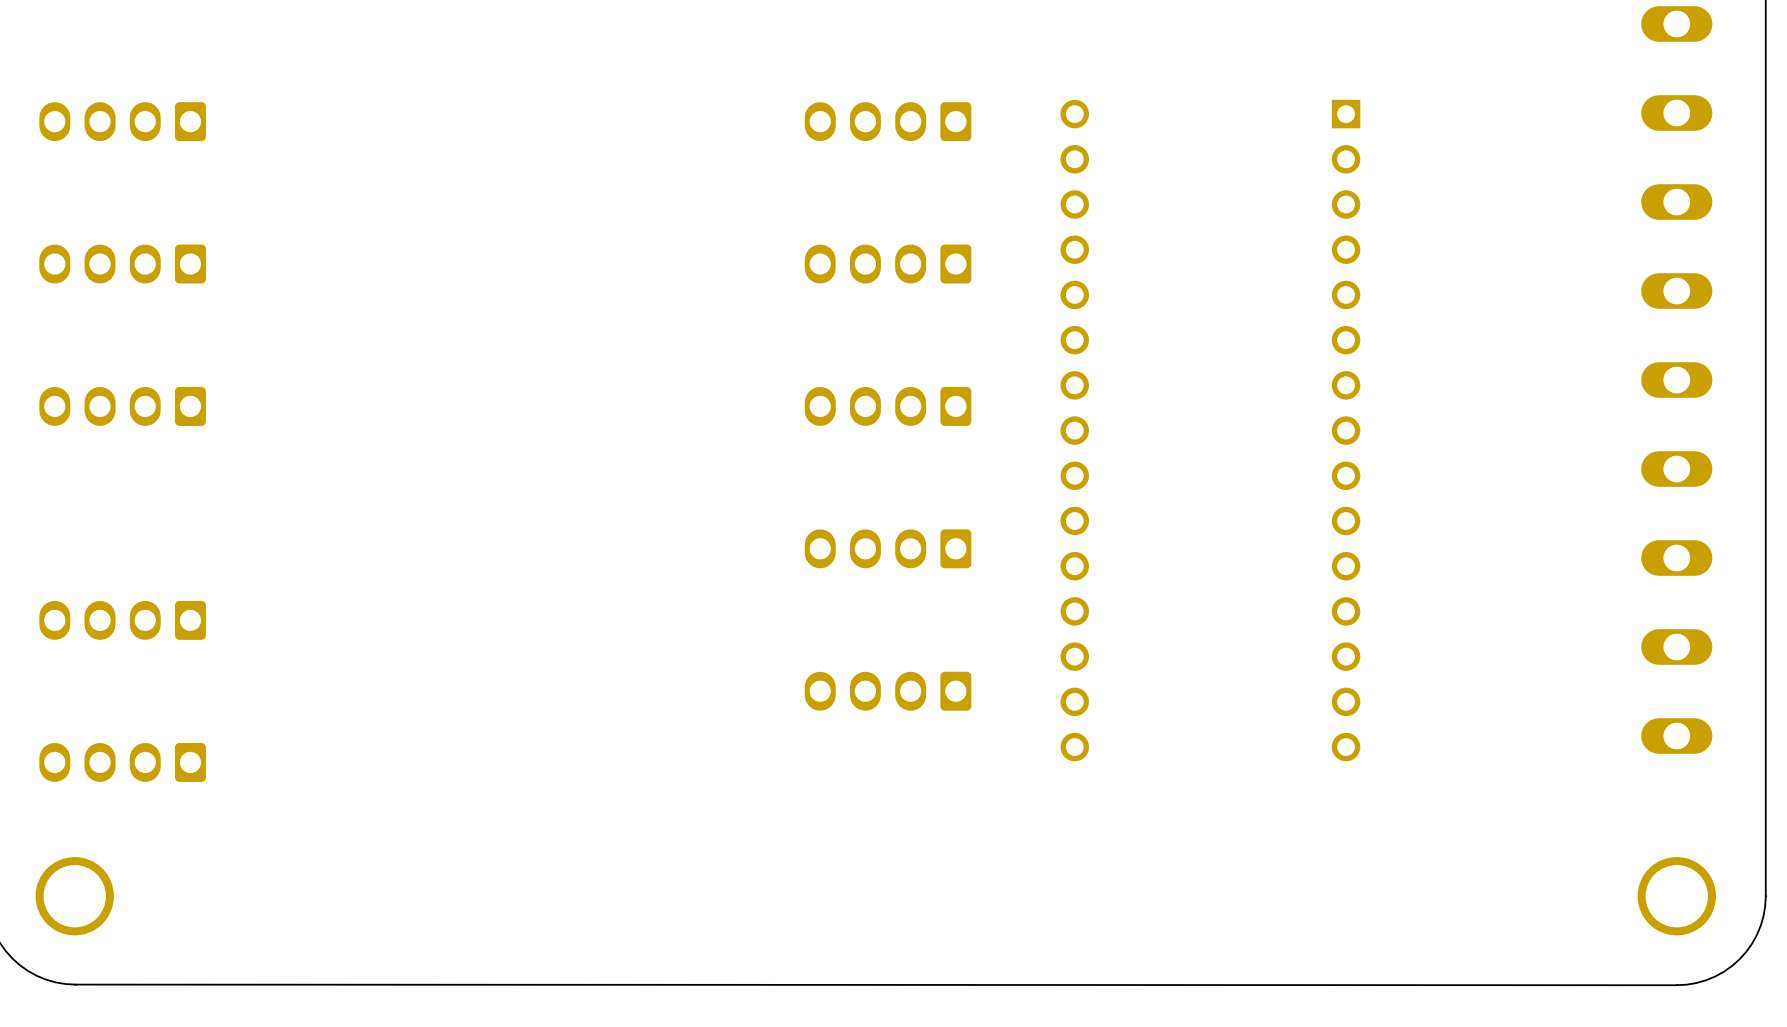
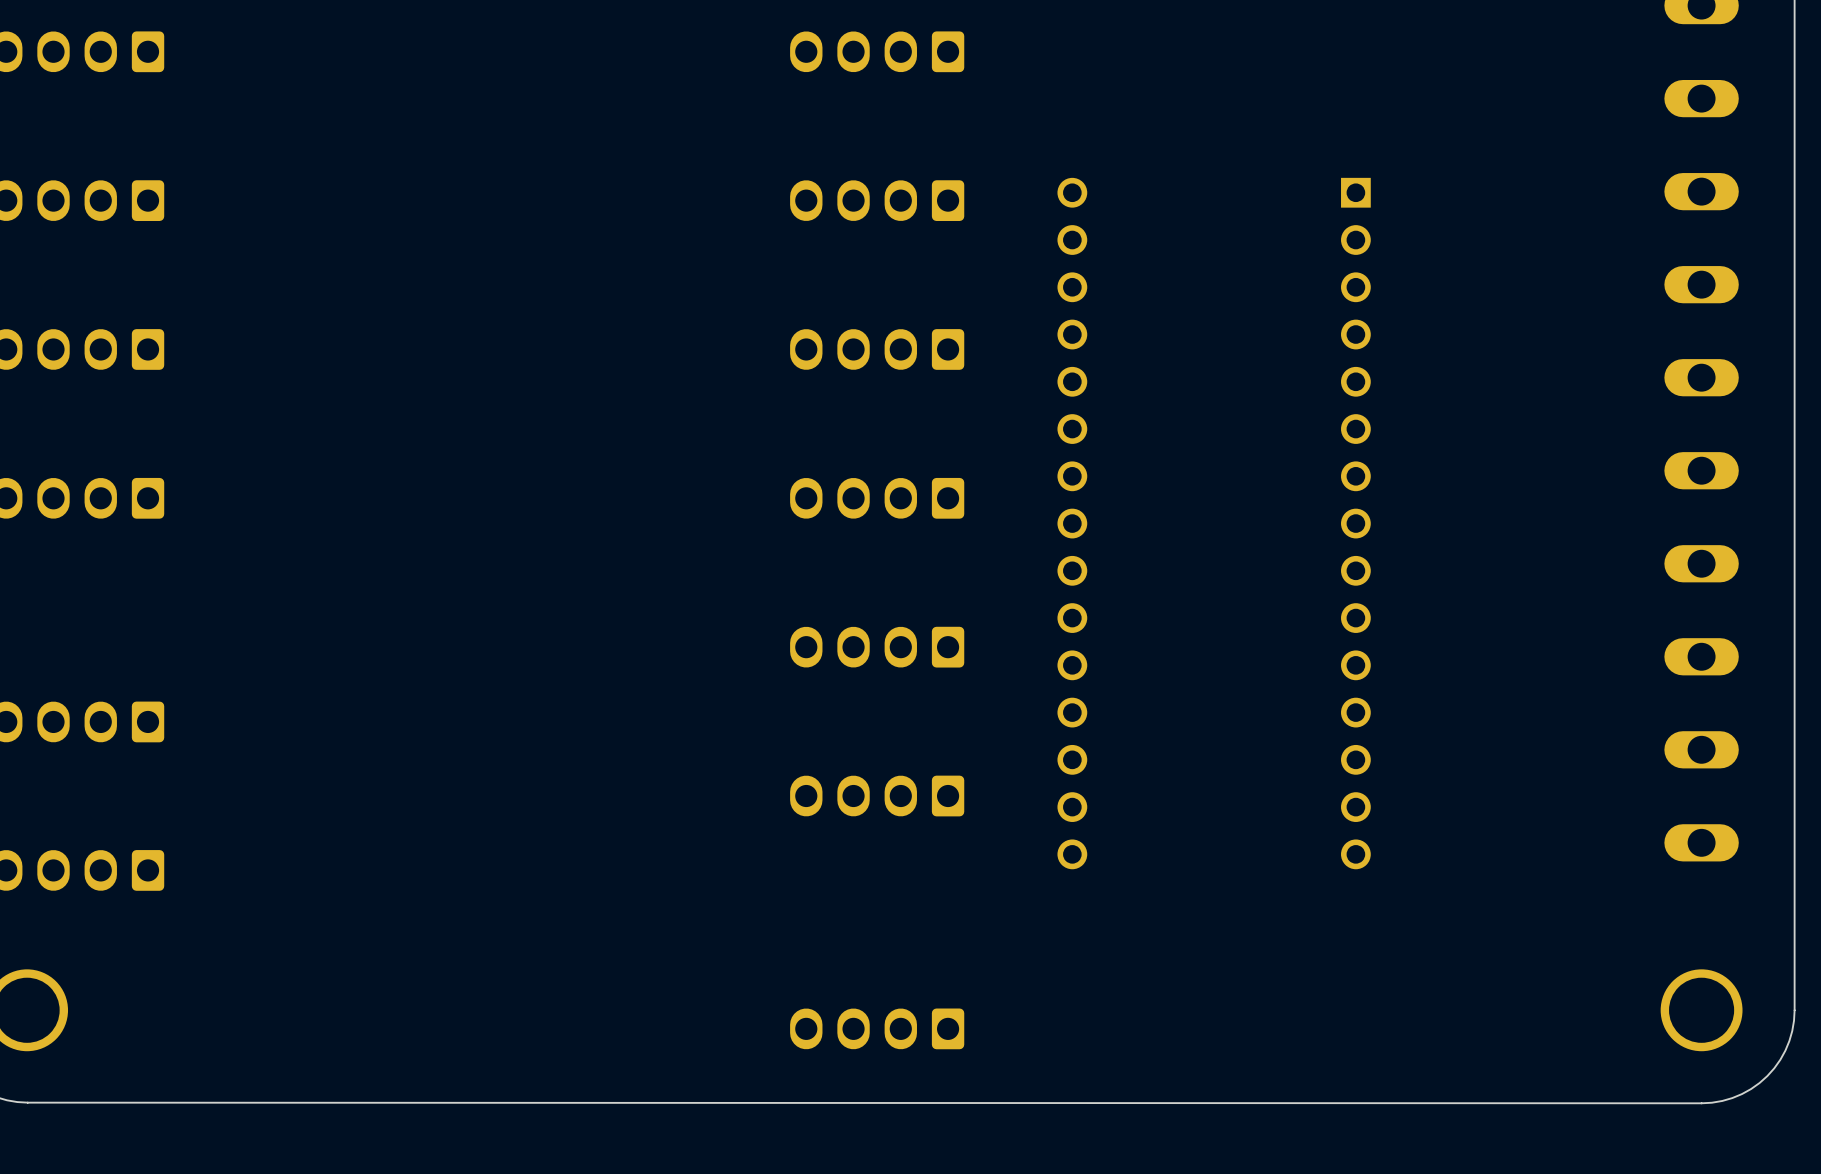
part: none -> (877, 1028)

